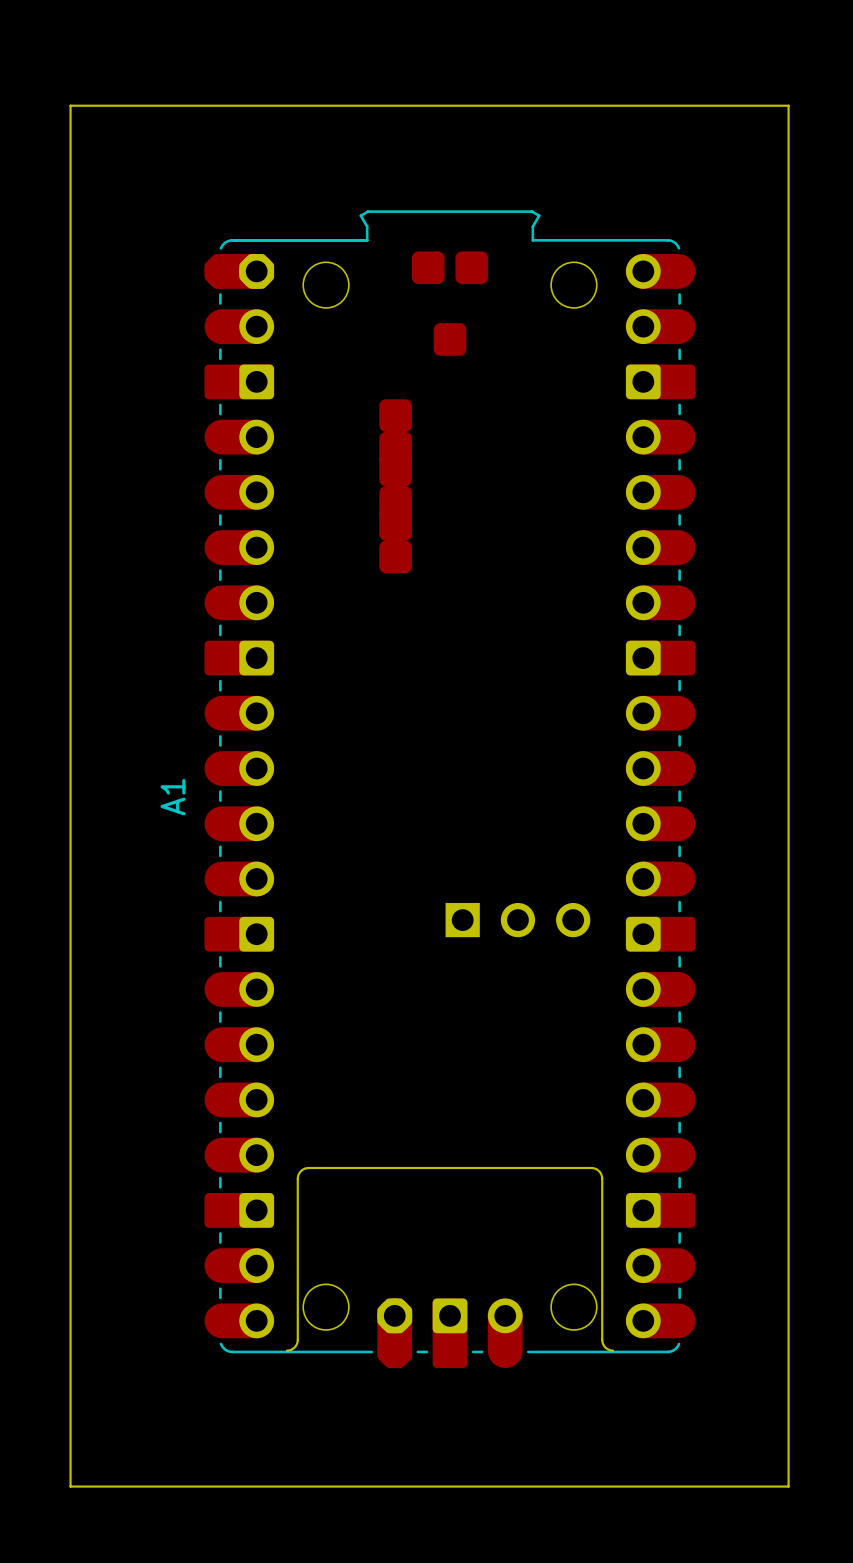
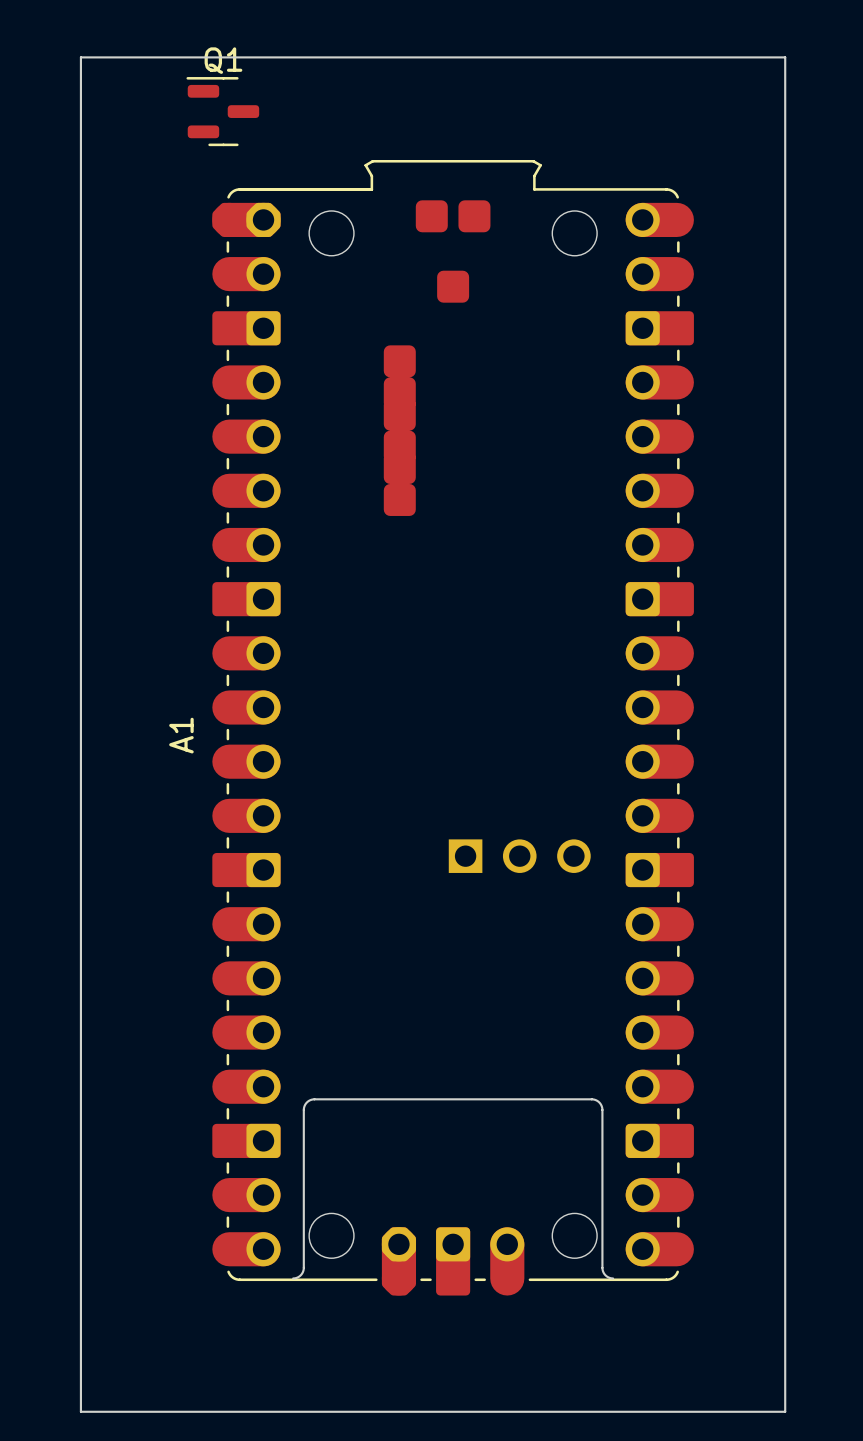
Q1: none -> (222, 111)

